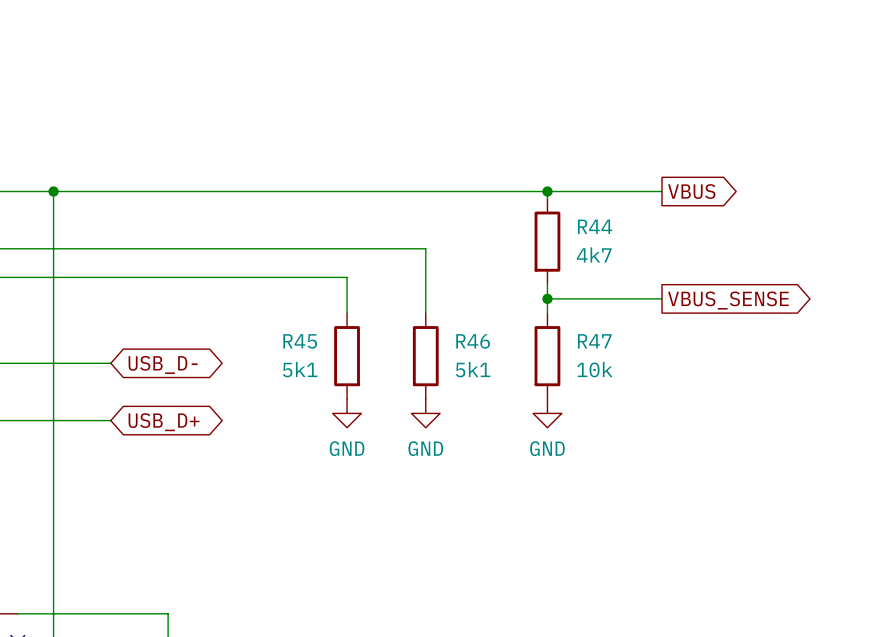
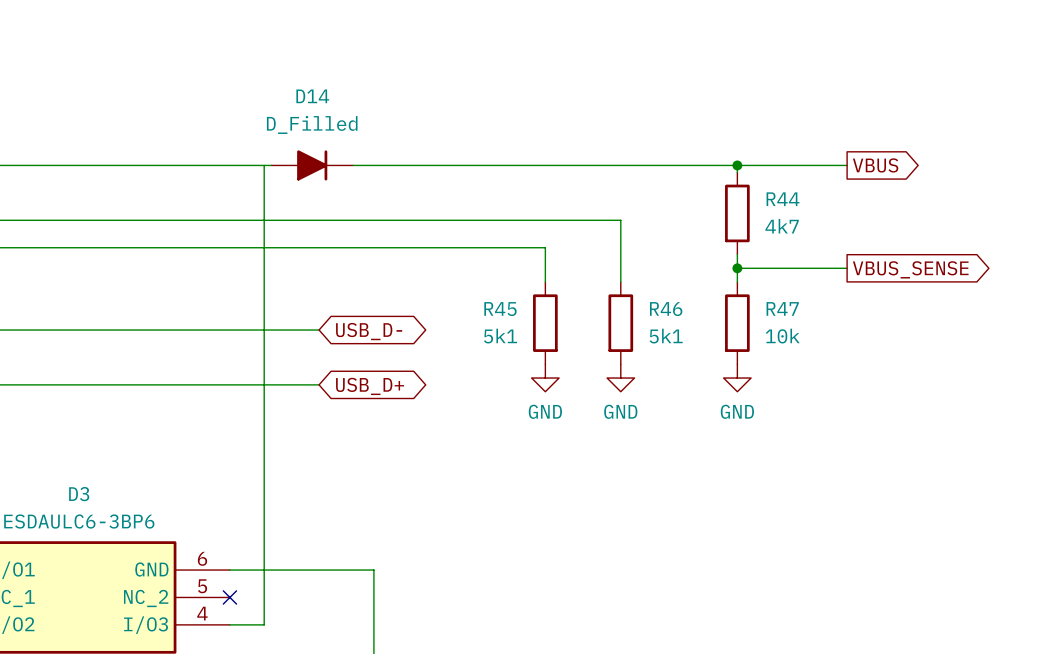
junction: (53, 191) -> none
D14: none -> D_Filled (312, 165)

